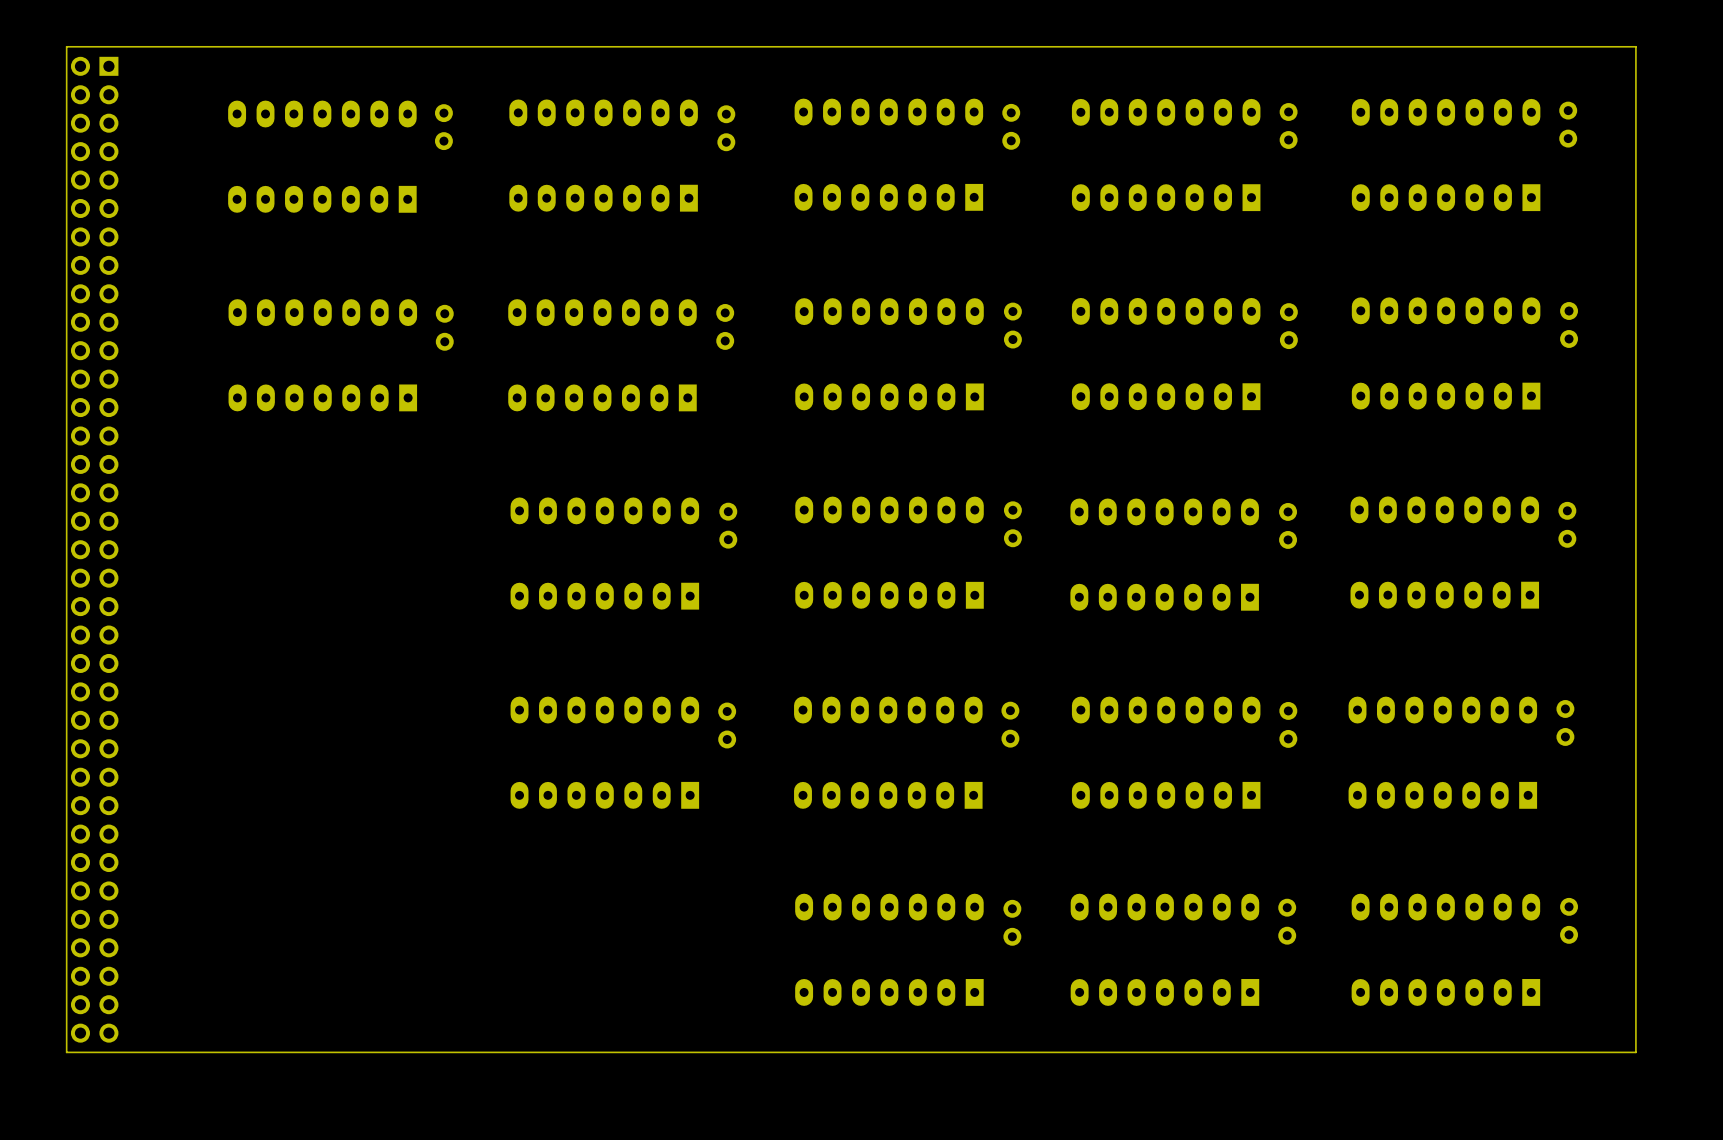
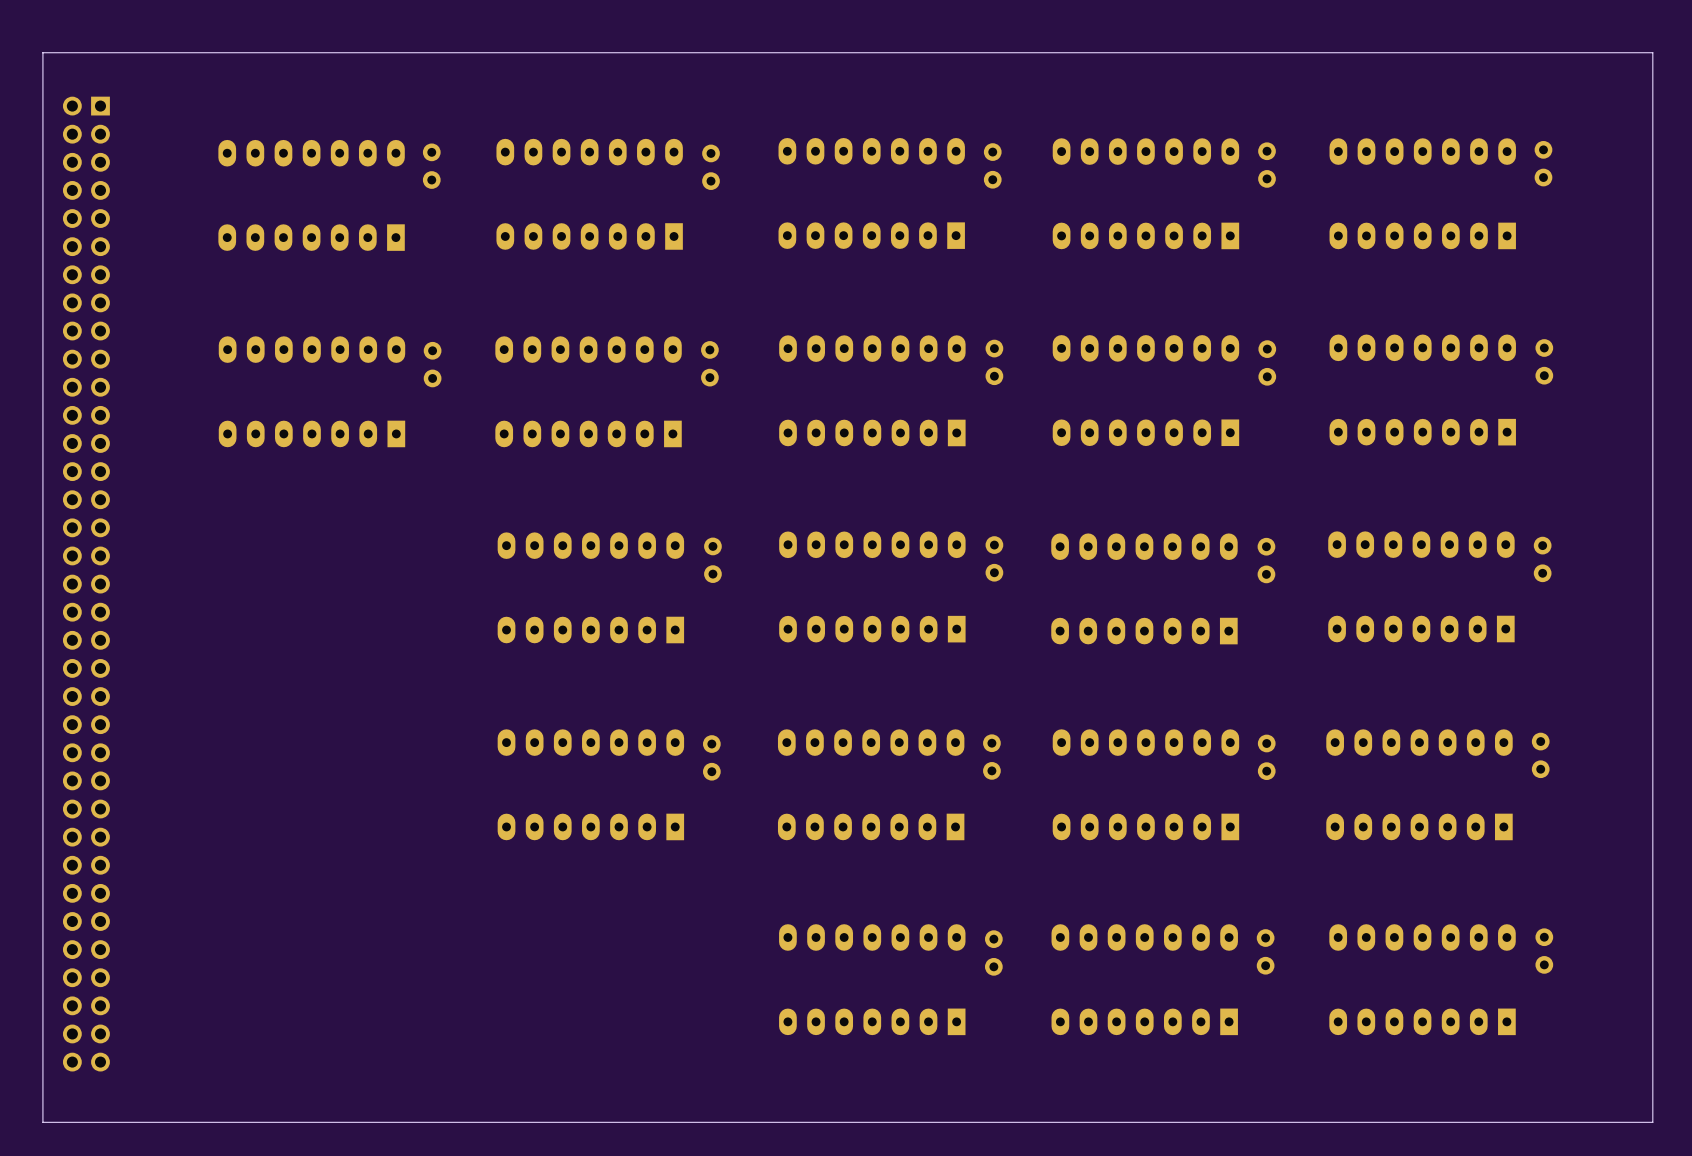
board edge: none -> (42, 52) (42, 1122) (1652, 1122) (1652, 52) (42, 52)
board edge: (1635, 46) (1635, 1052) (66, 1052) (66, 46) (1635, 46) -> none

